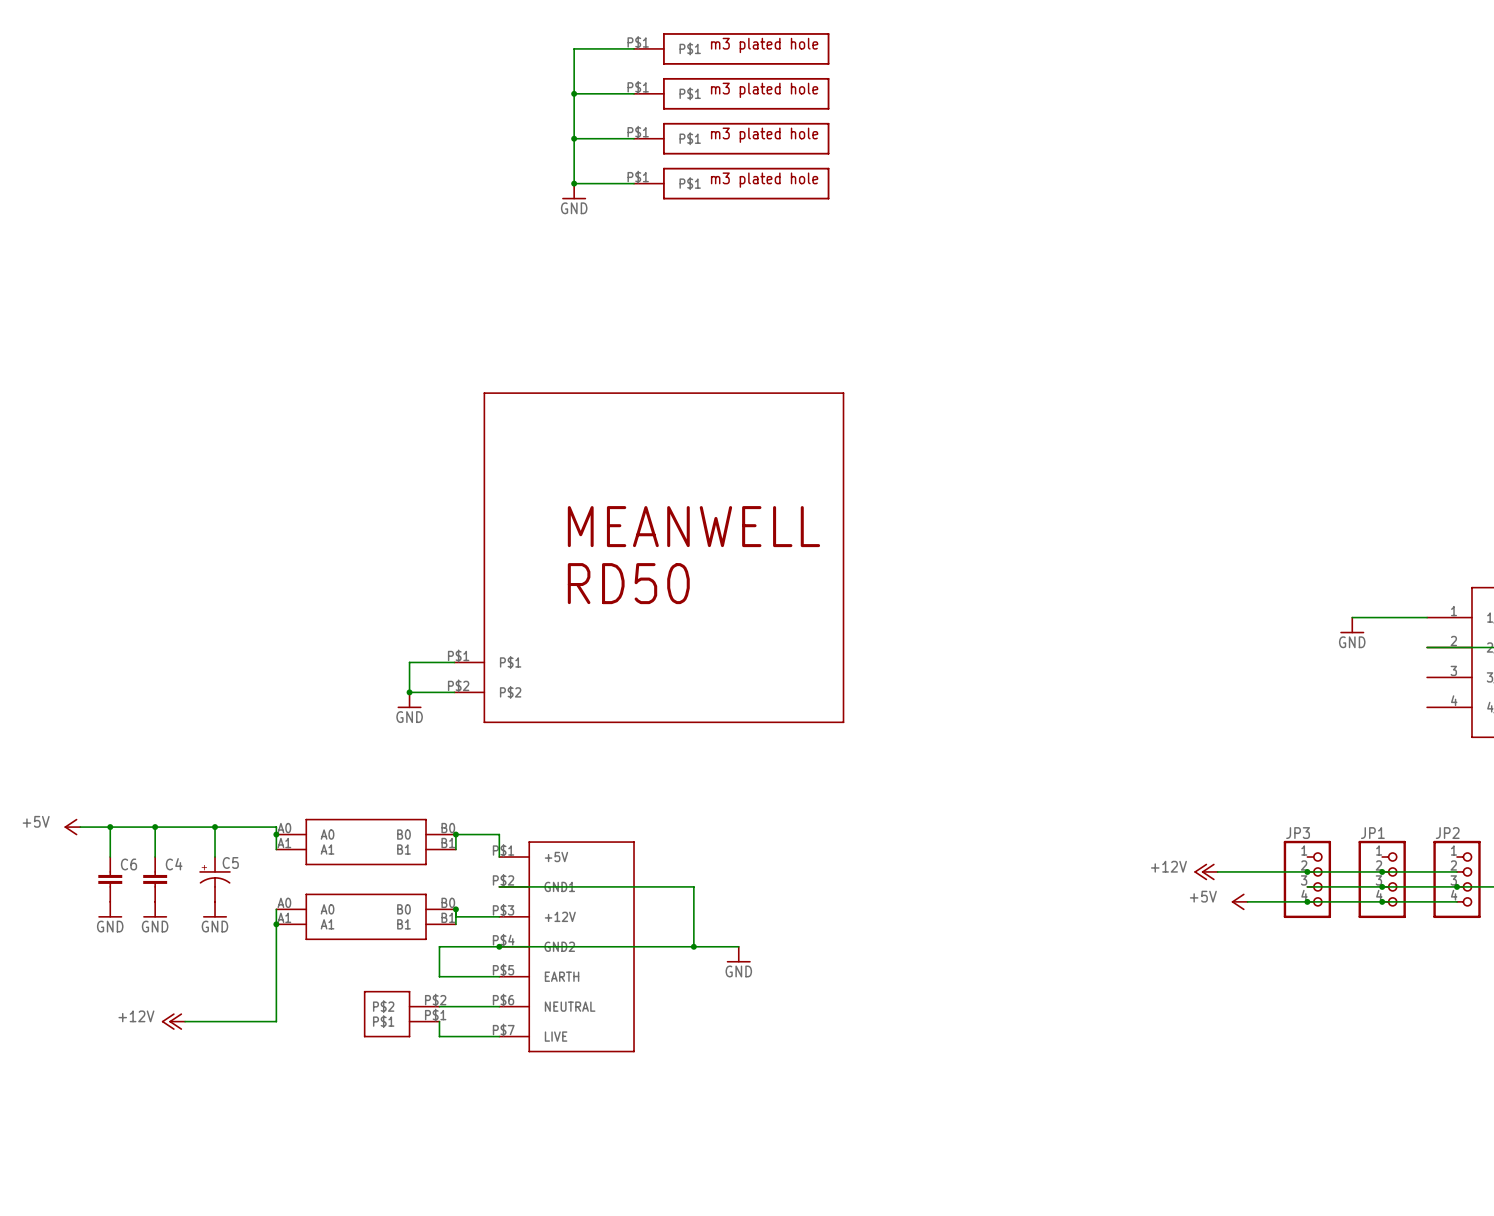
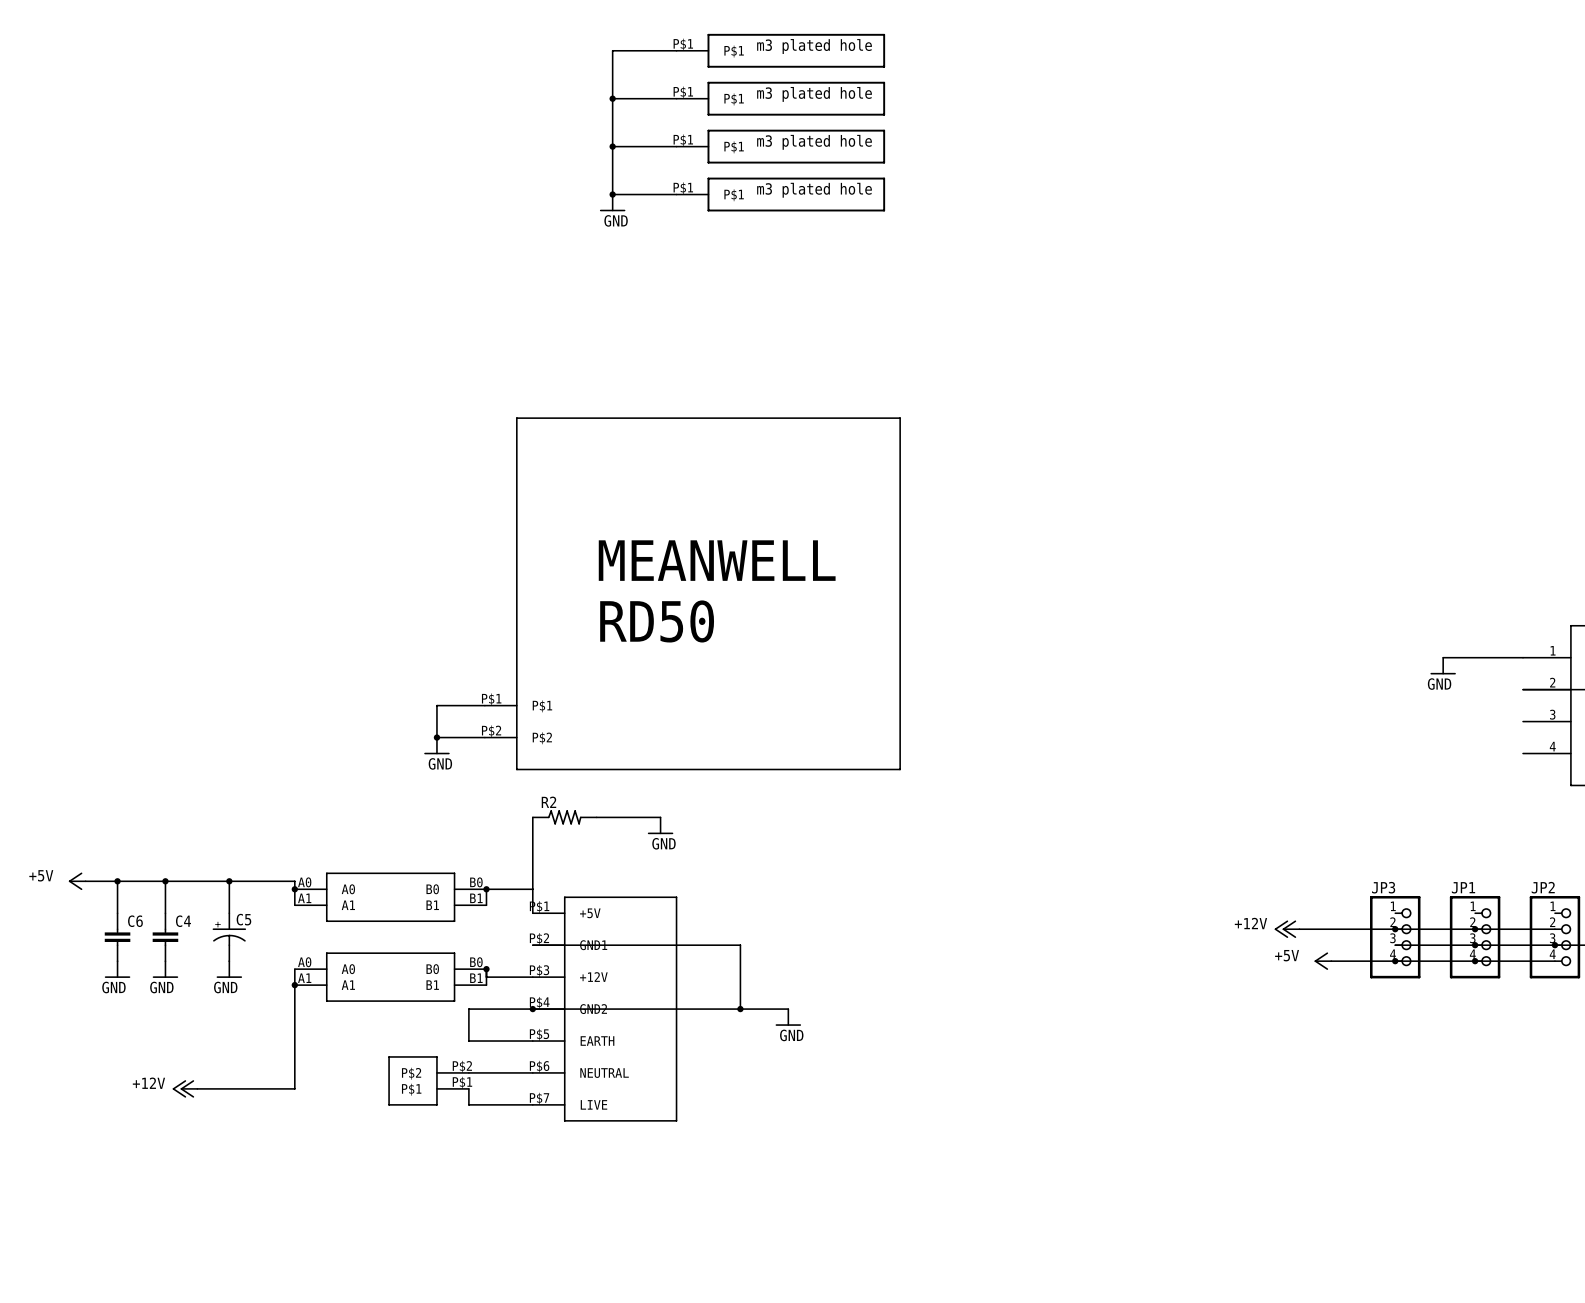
wire: none -> (532, 817) (532, 889)
R2: none -> (564, 817)
wire: none -> (596, 817) (660, 817)
power symbol: none -> GND (660, 825)

